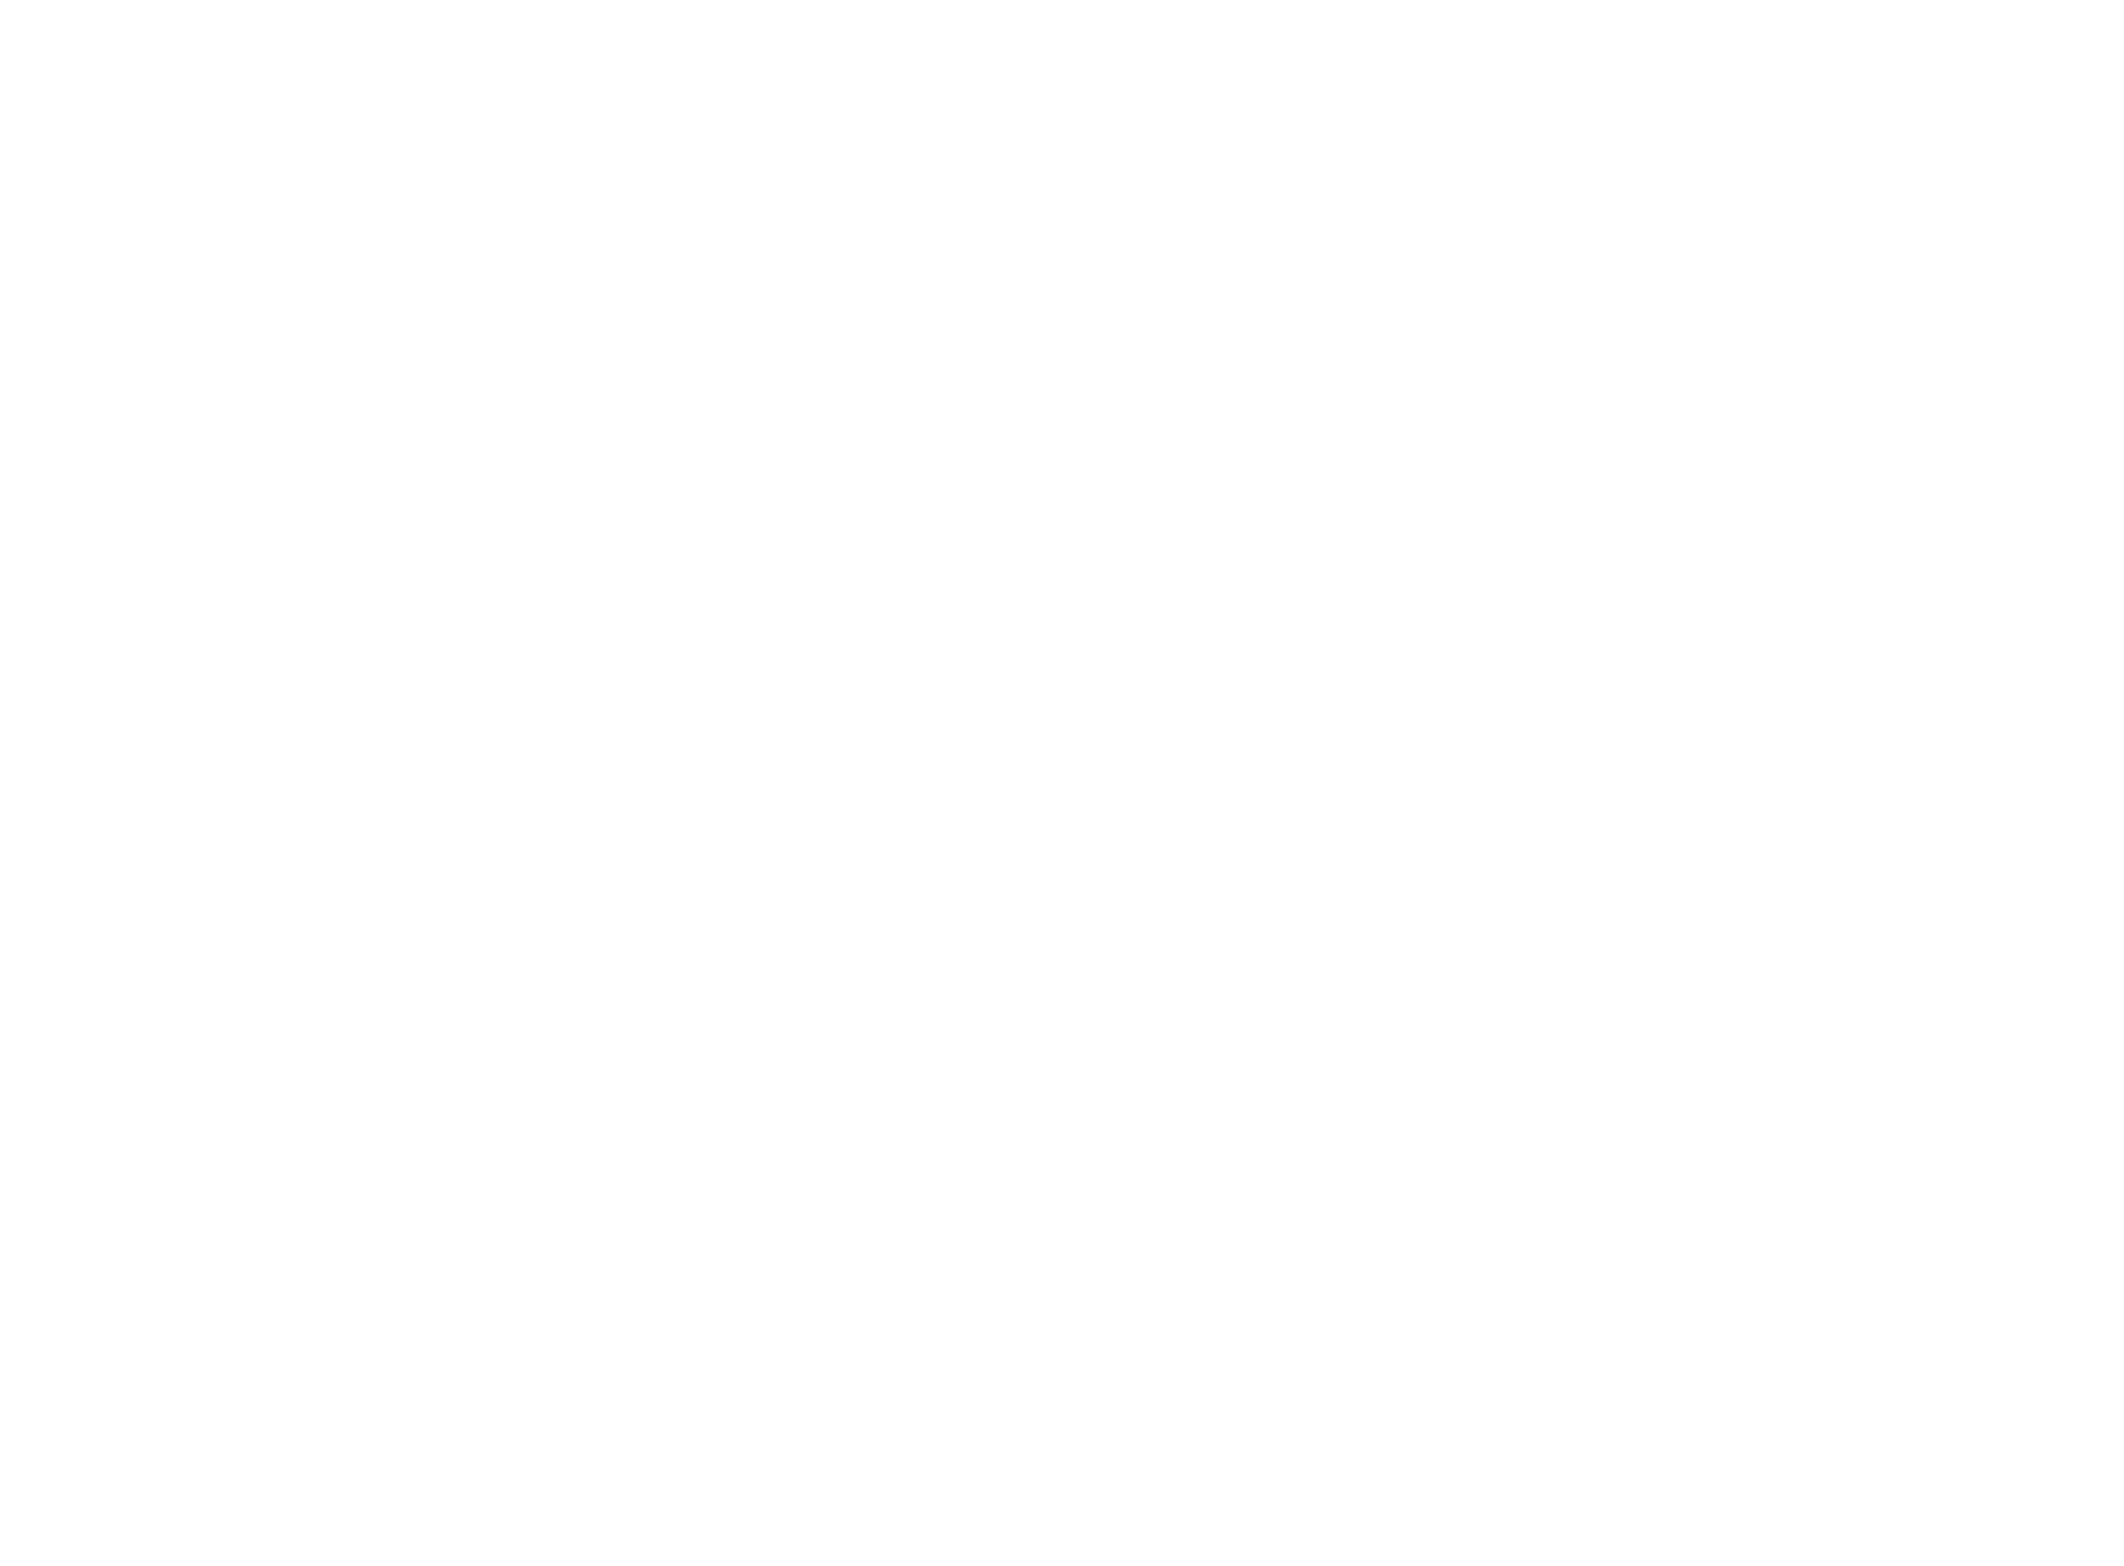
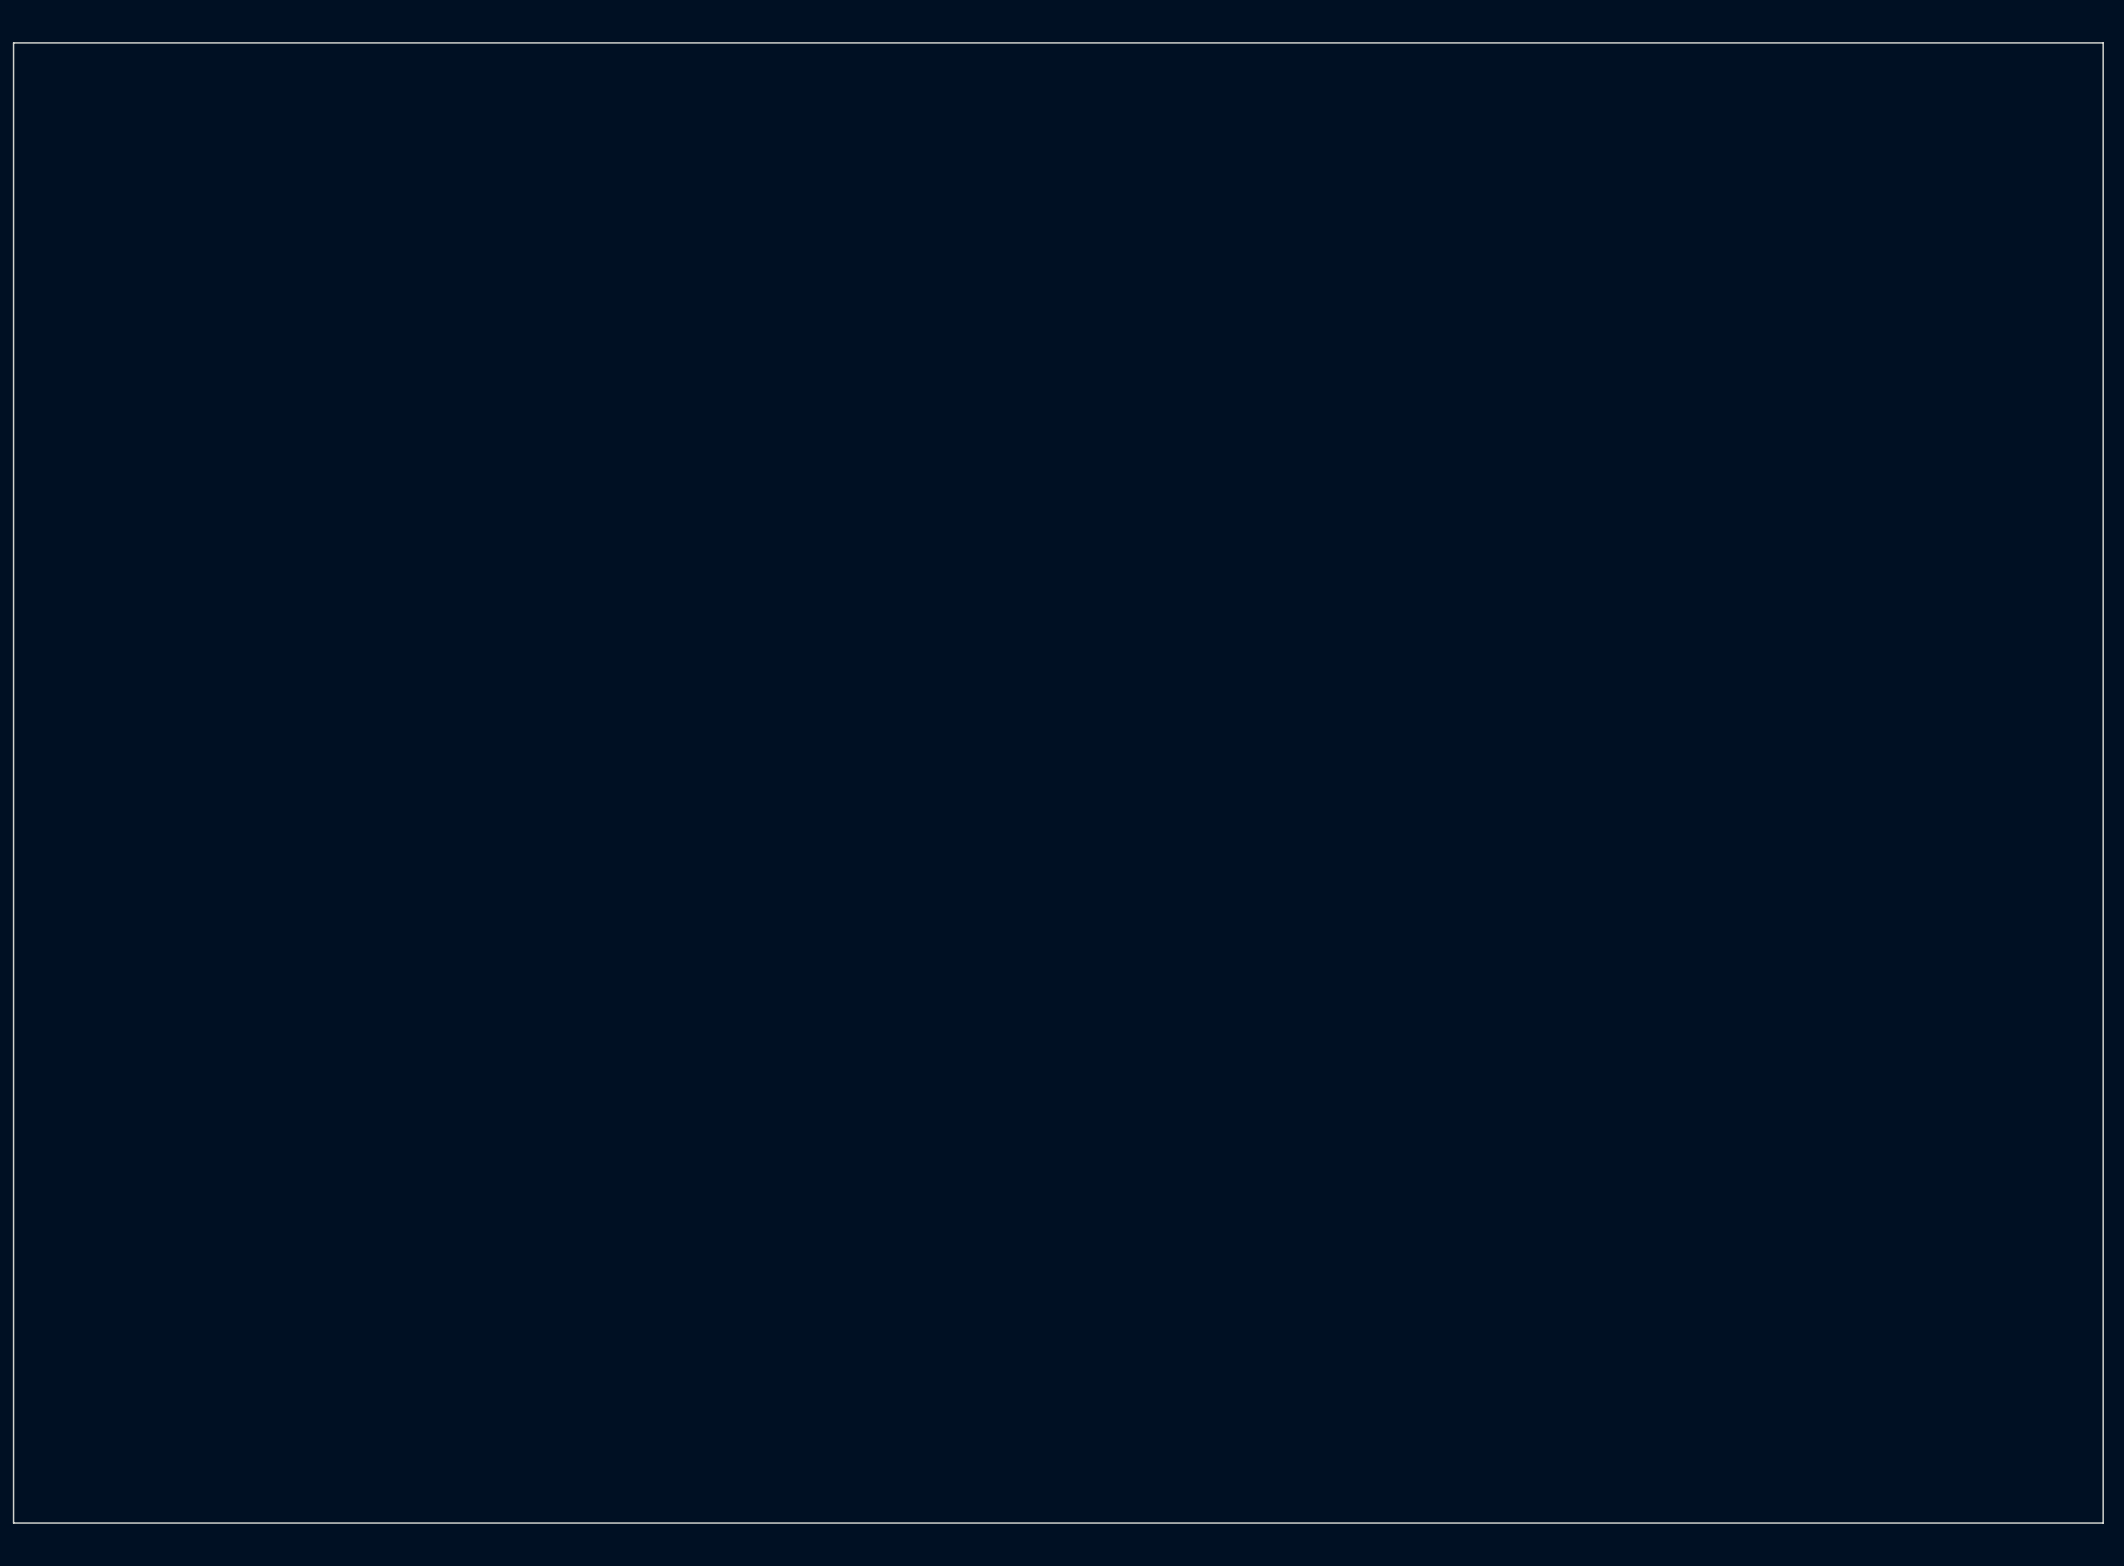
board edge: none -> (2103, 42) (13, 42) (13, 1523) (2103, 1523) (2103, 42)

